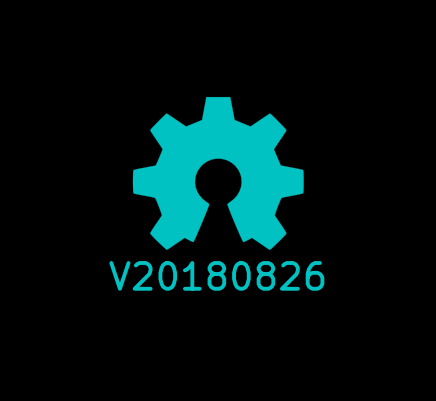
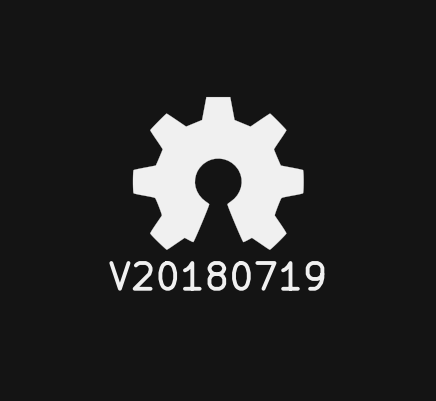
drawing shape: [109, 261, 325, 291] -> [109, 261, 325, 291]

